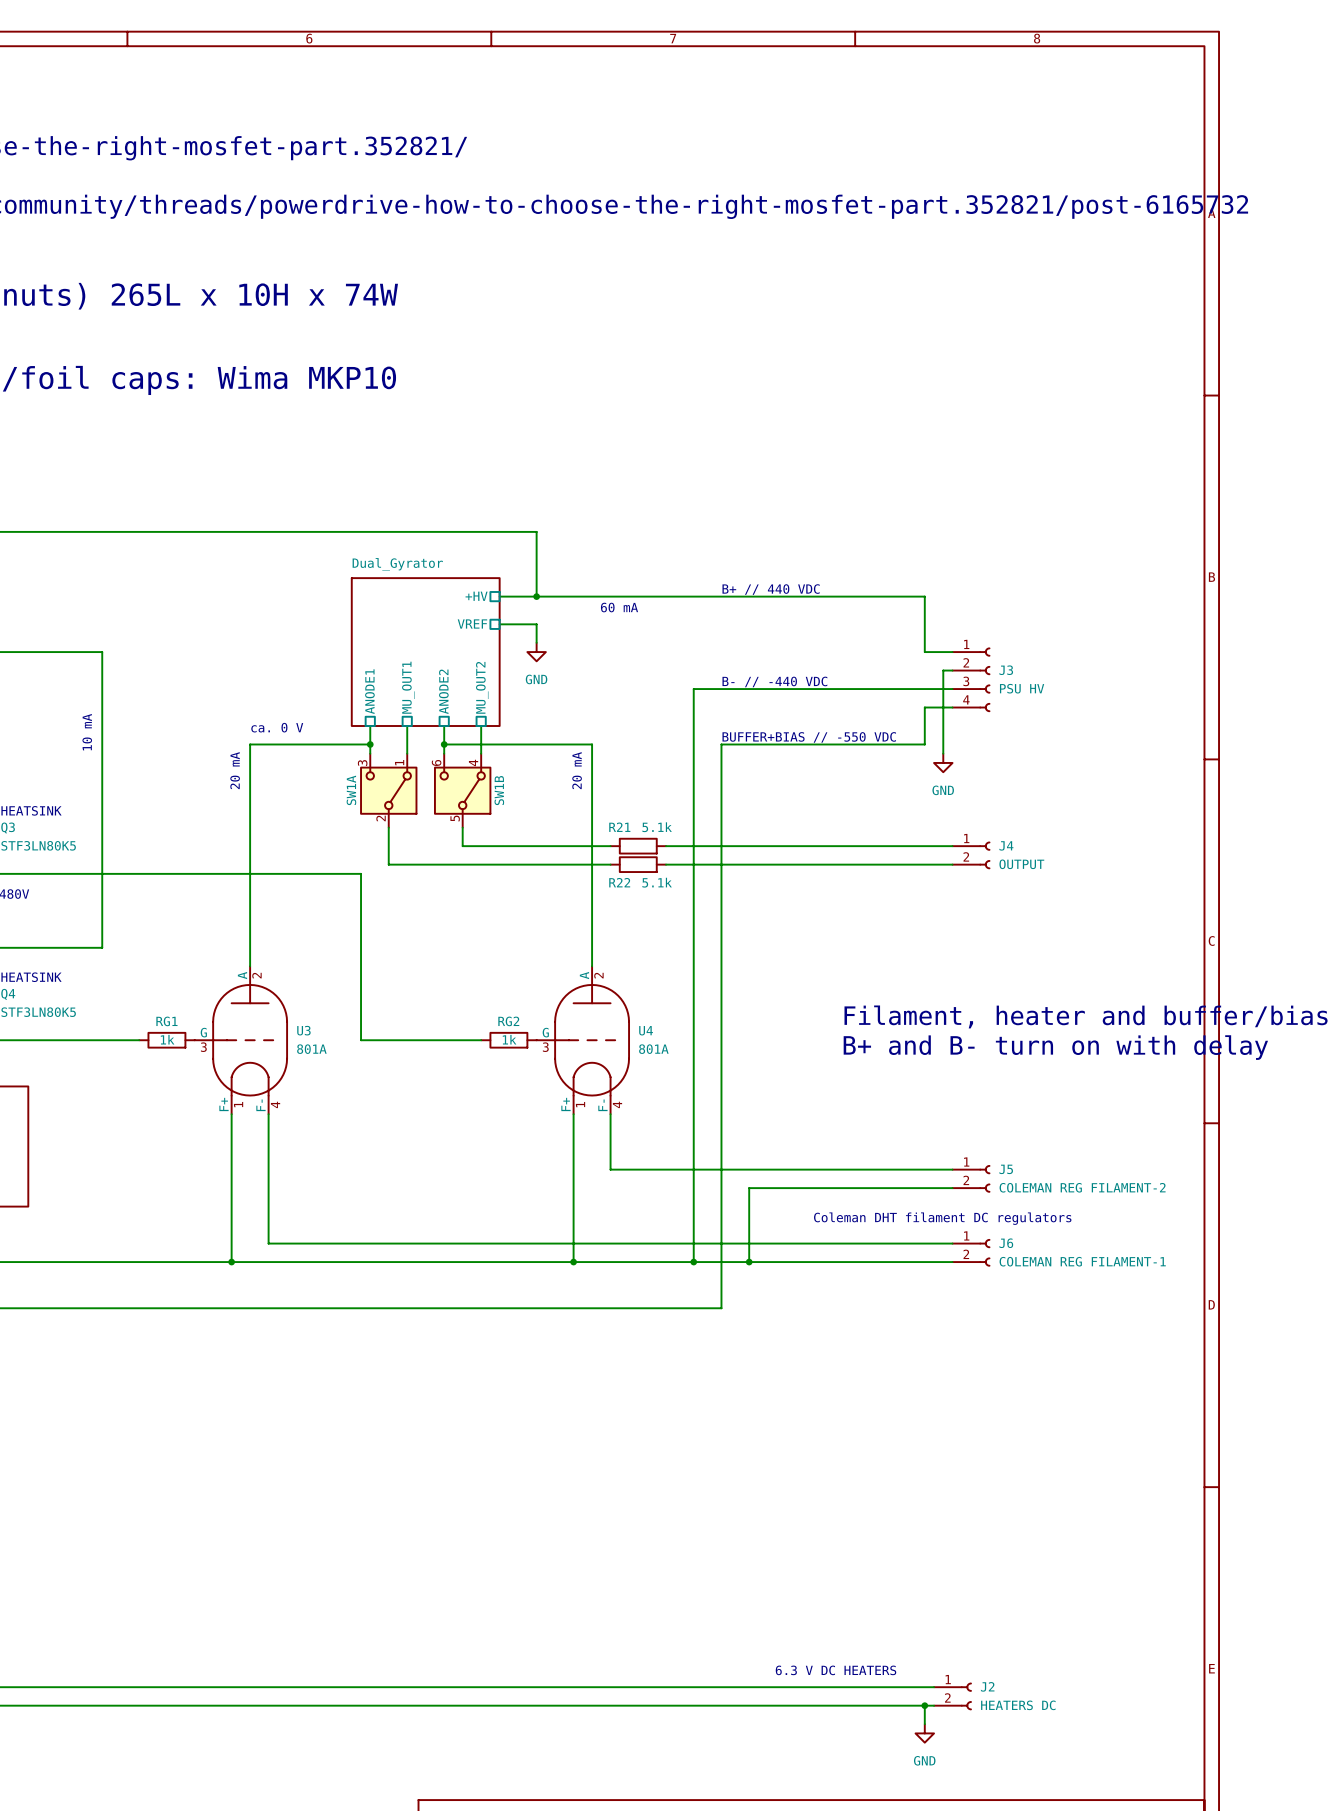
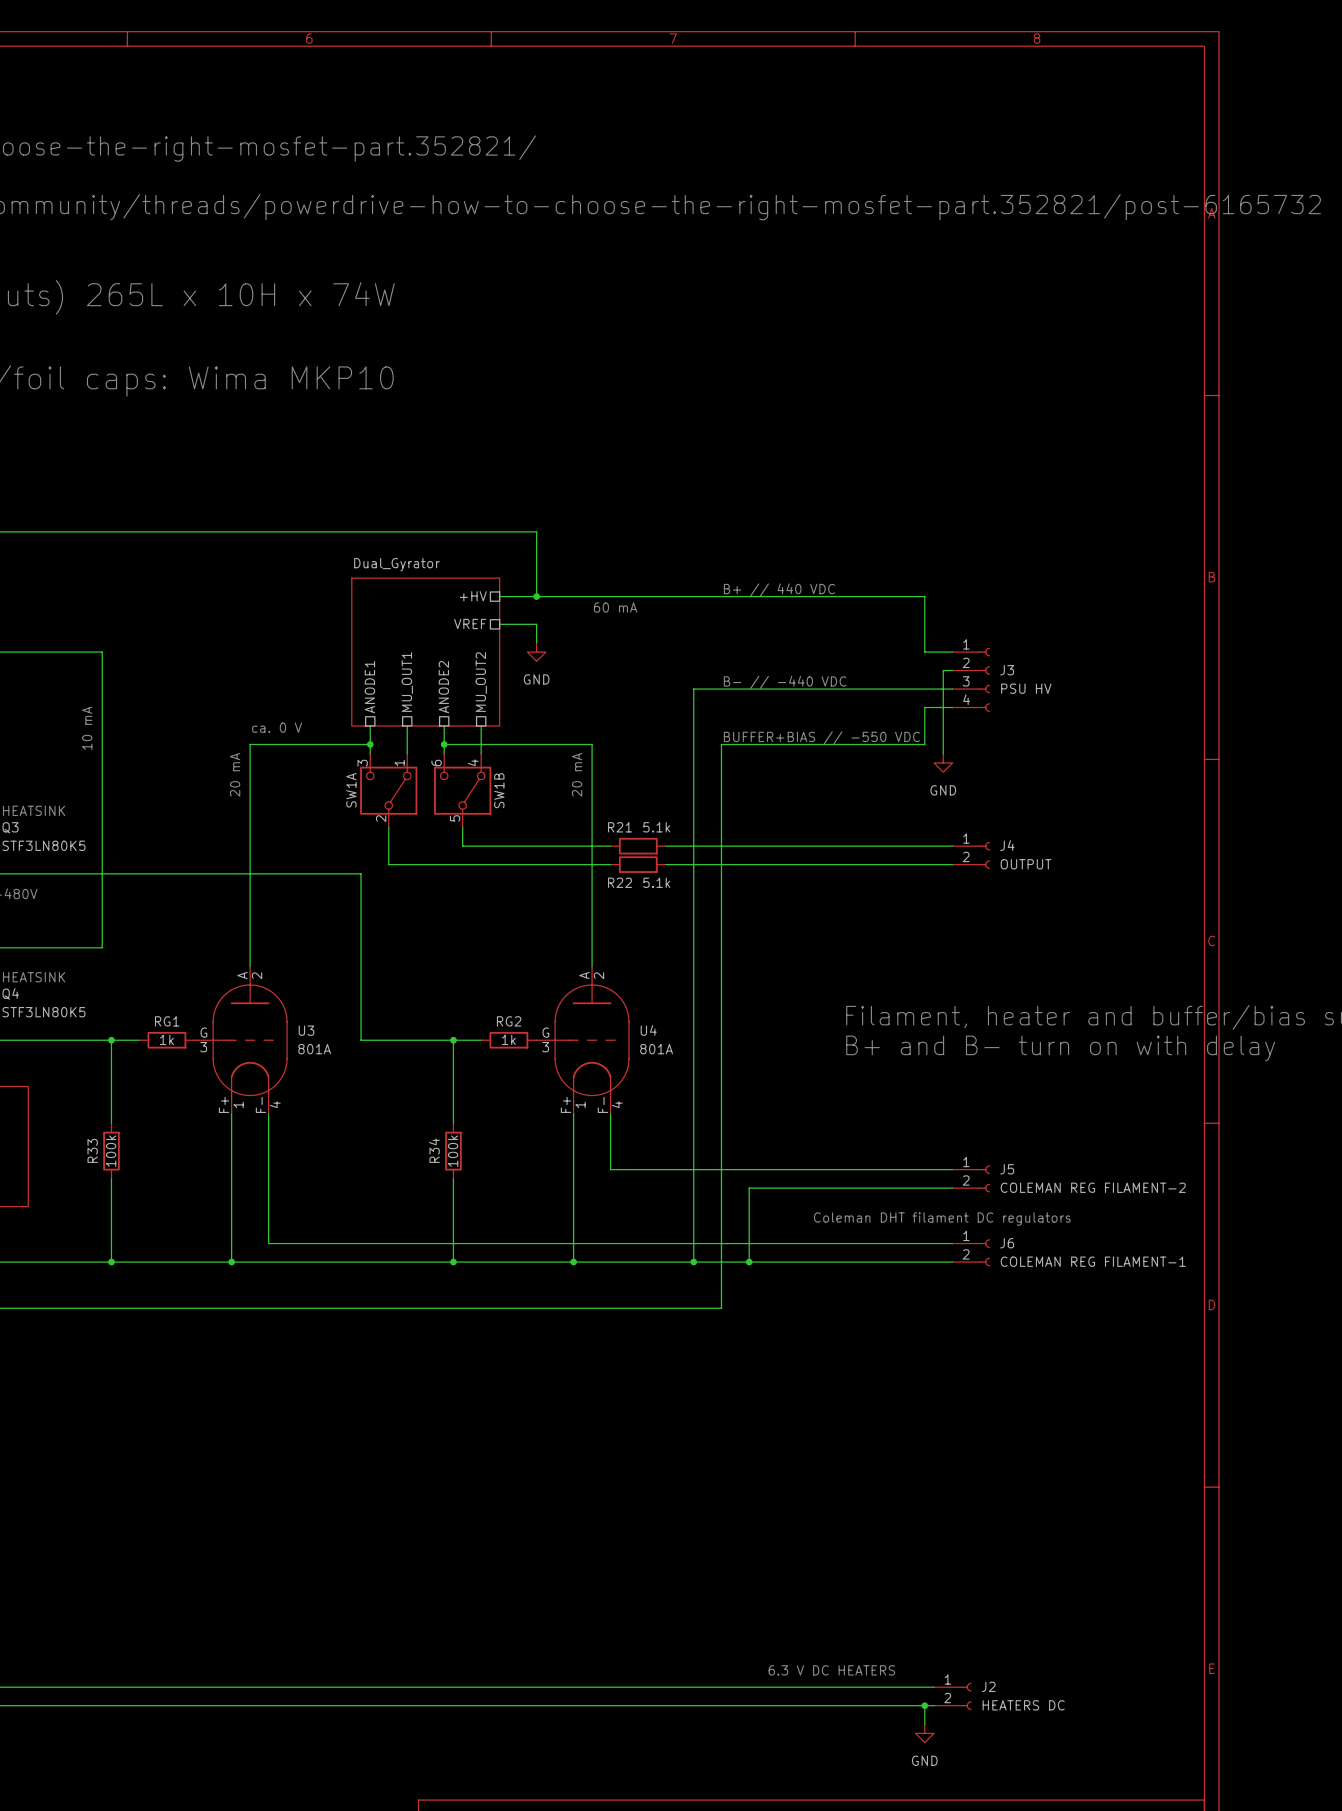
wire: none -> (111, 1040) (111, 1123)
junction: none -> (111, 1040)
wire: none -> (453, 1040) (453, 1123)
junction: none -> (453, 1040)
R33: none -> 100k (111, 1151)
R34: none -> 100k (453, 1151)
wire: none -> (111, 1178) (111, 1262)
wire: none -> (453, 1178) (453, 1262)
junction: none -> (111, 1262)
junction: none -> (453, 1262)

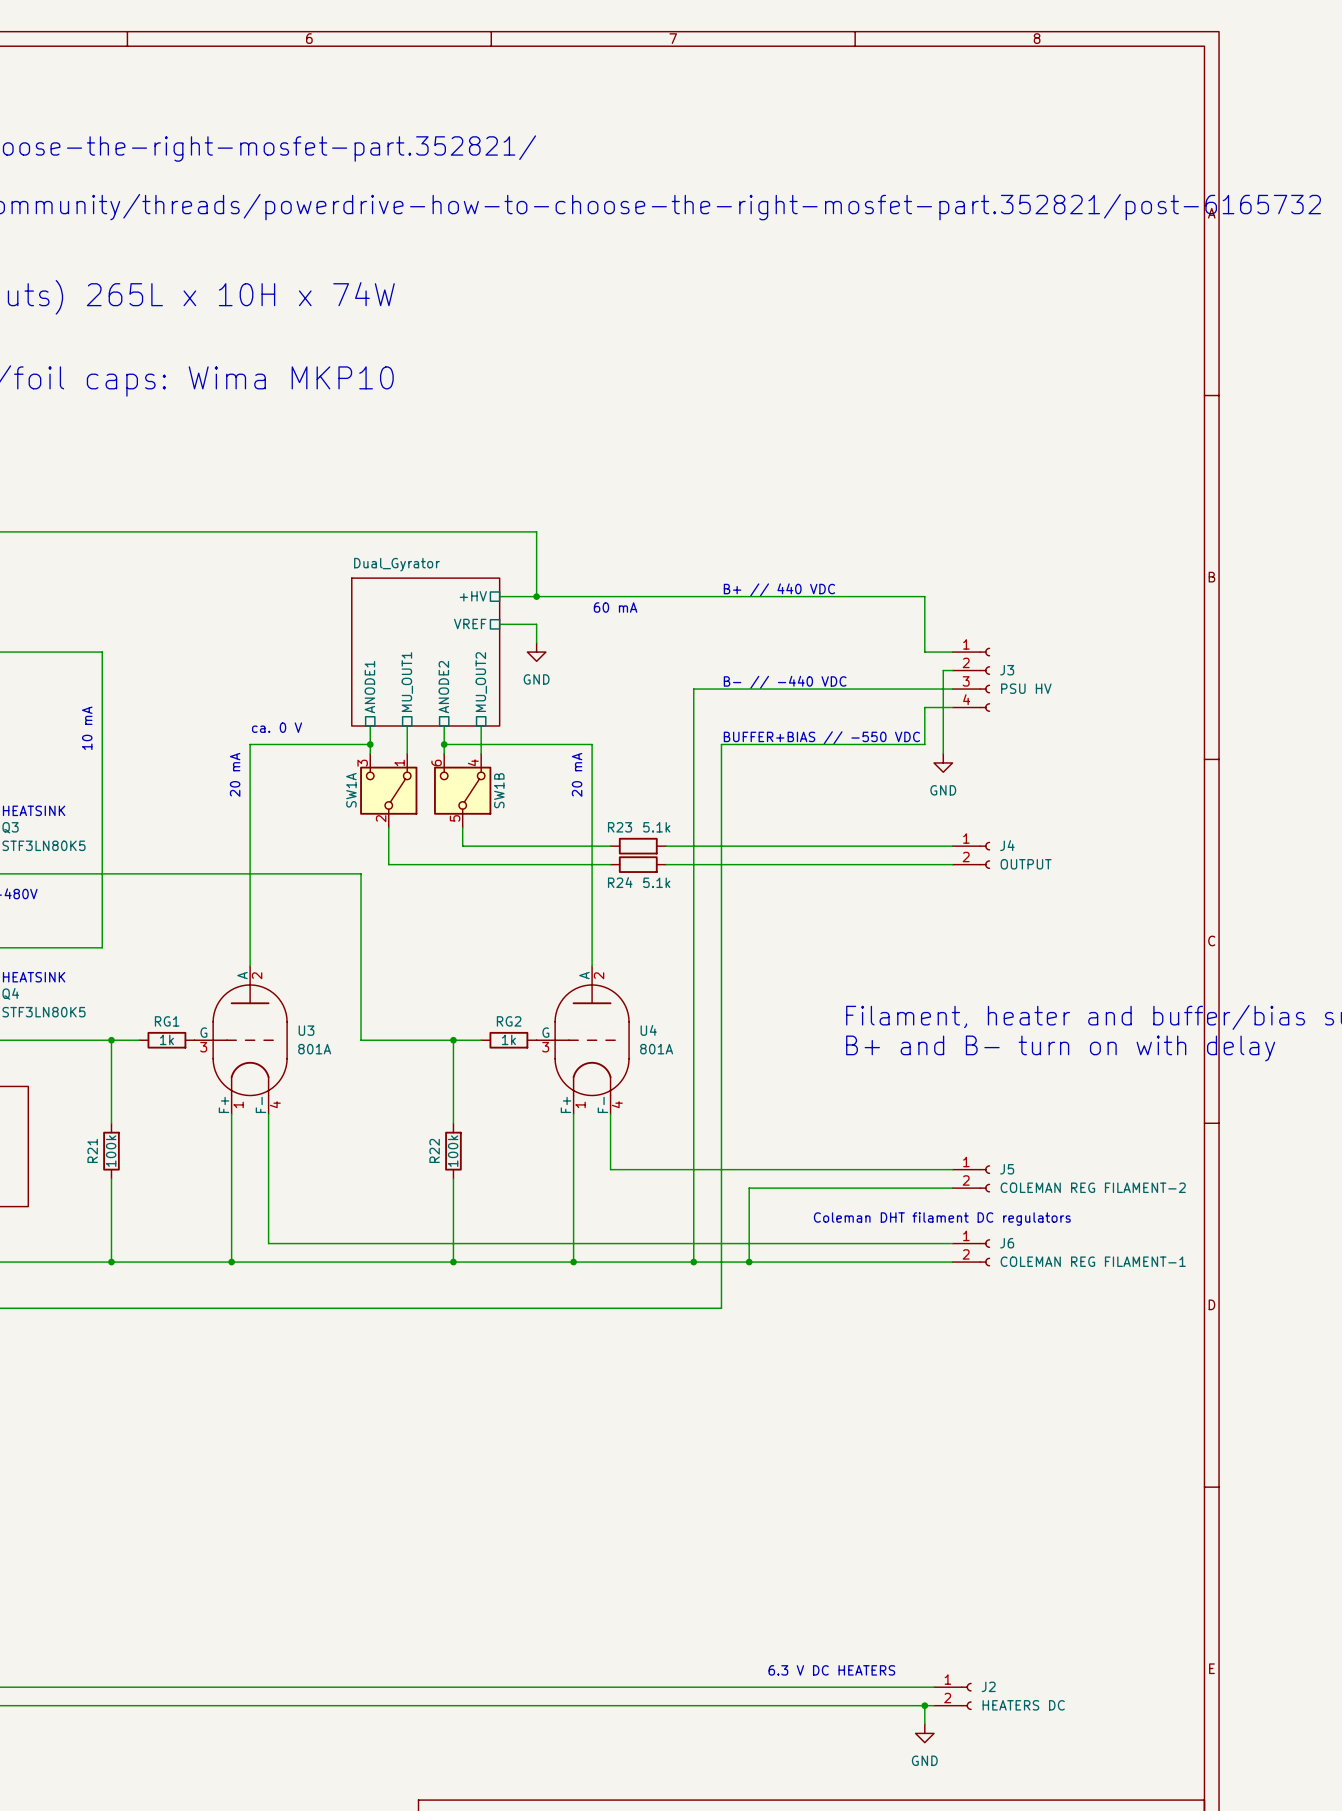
R21 name: R21 (620, 827) -> R23 (620, 827)
R22 name: R22 (620, 882) -> R24 (620, 882)
R33 name: R33 (92, 1150) -> R21 (92, 1150)
R34 name: R34 (434, 1150) -> R22 (434, 1150)

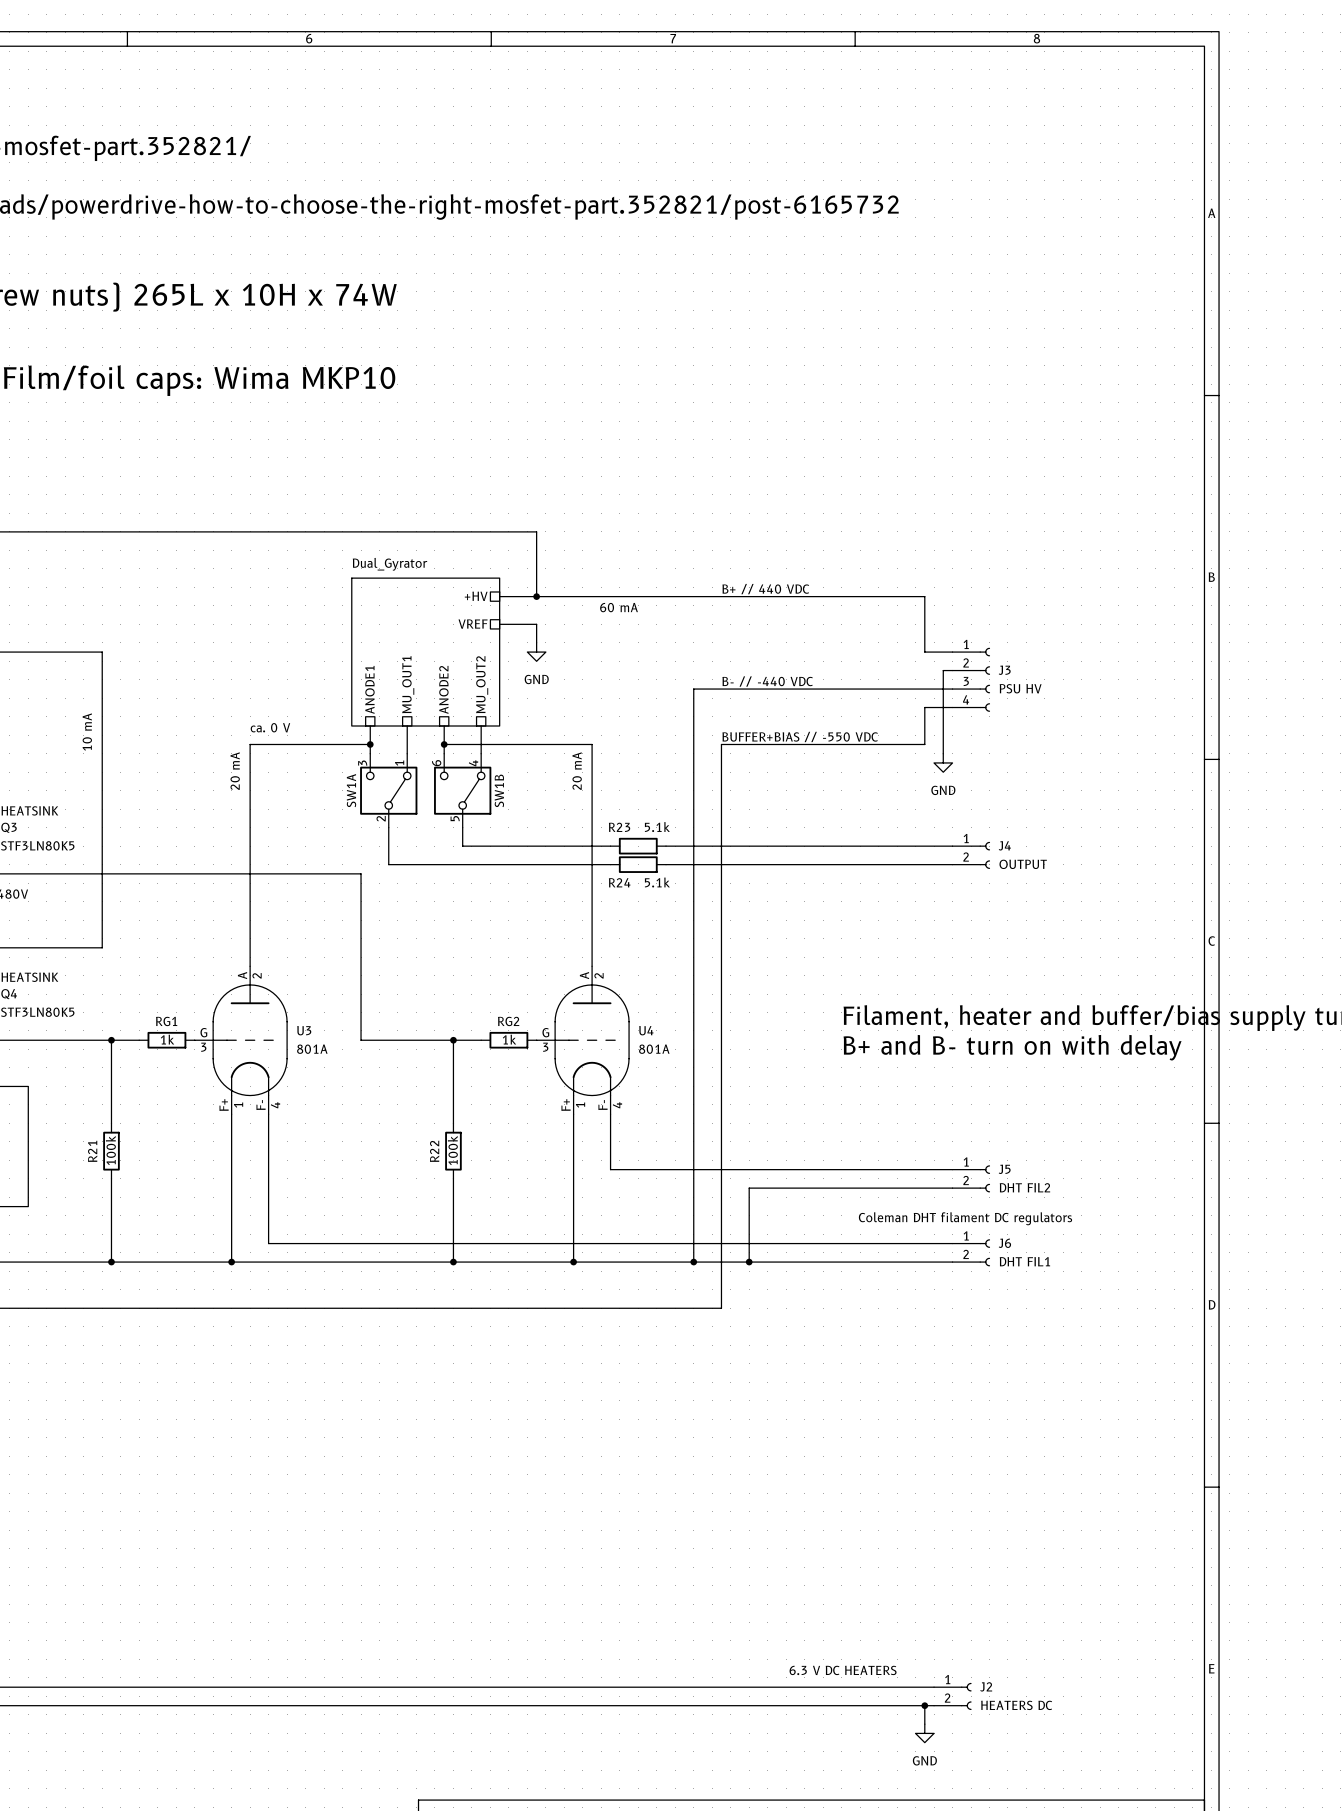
J5 value: COLEMAN REG FILAMENT-2 (1093, 1187) -> DHT FIL2 (1024, 1187)
J6 value: COLEMAN REG FILAMENT-1 (1093, 1261) -> DHT FIL1 (1024, 1261)

